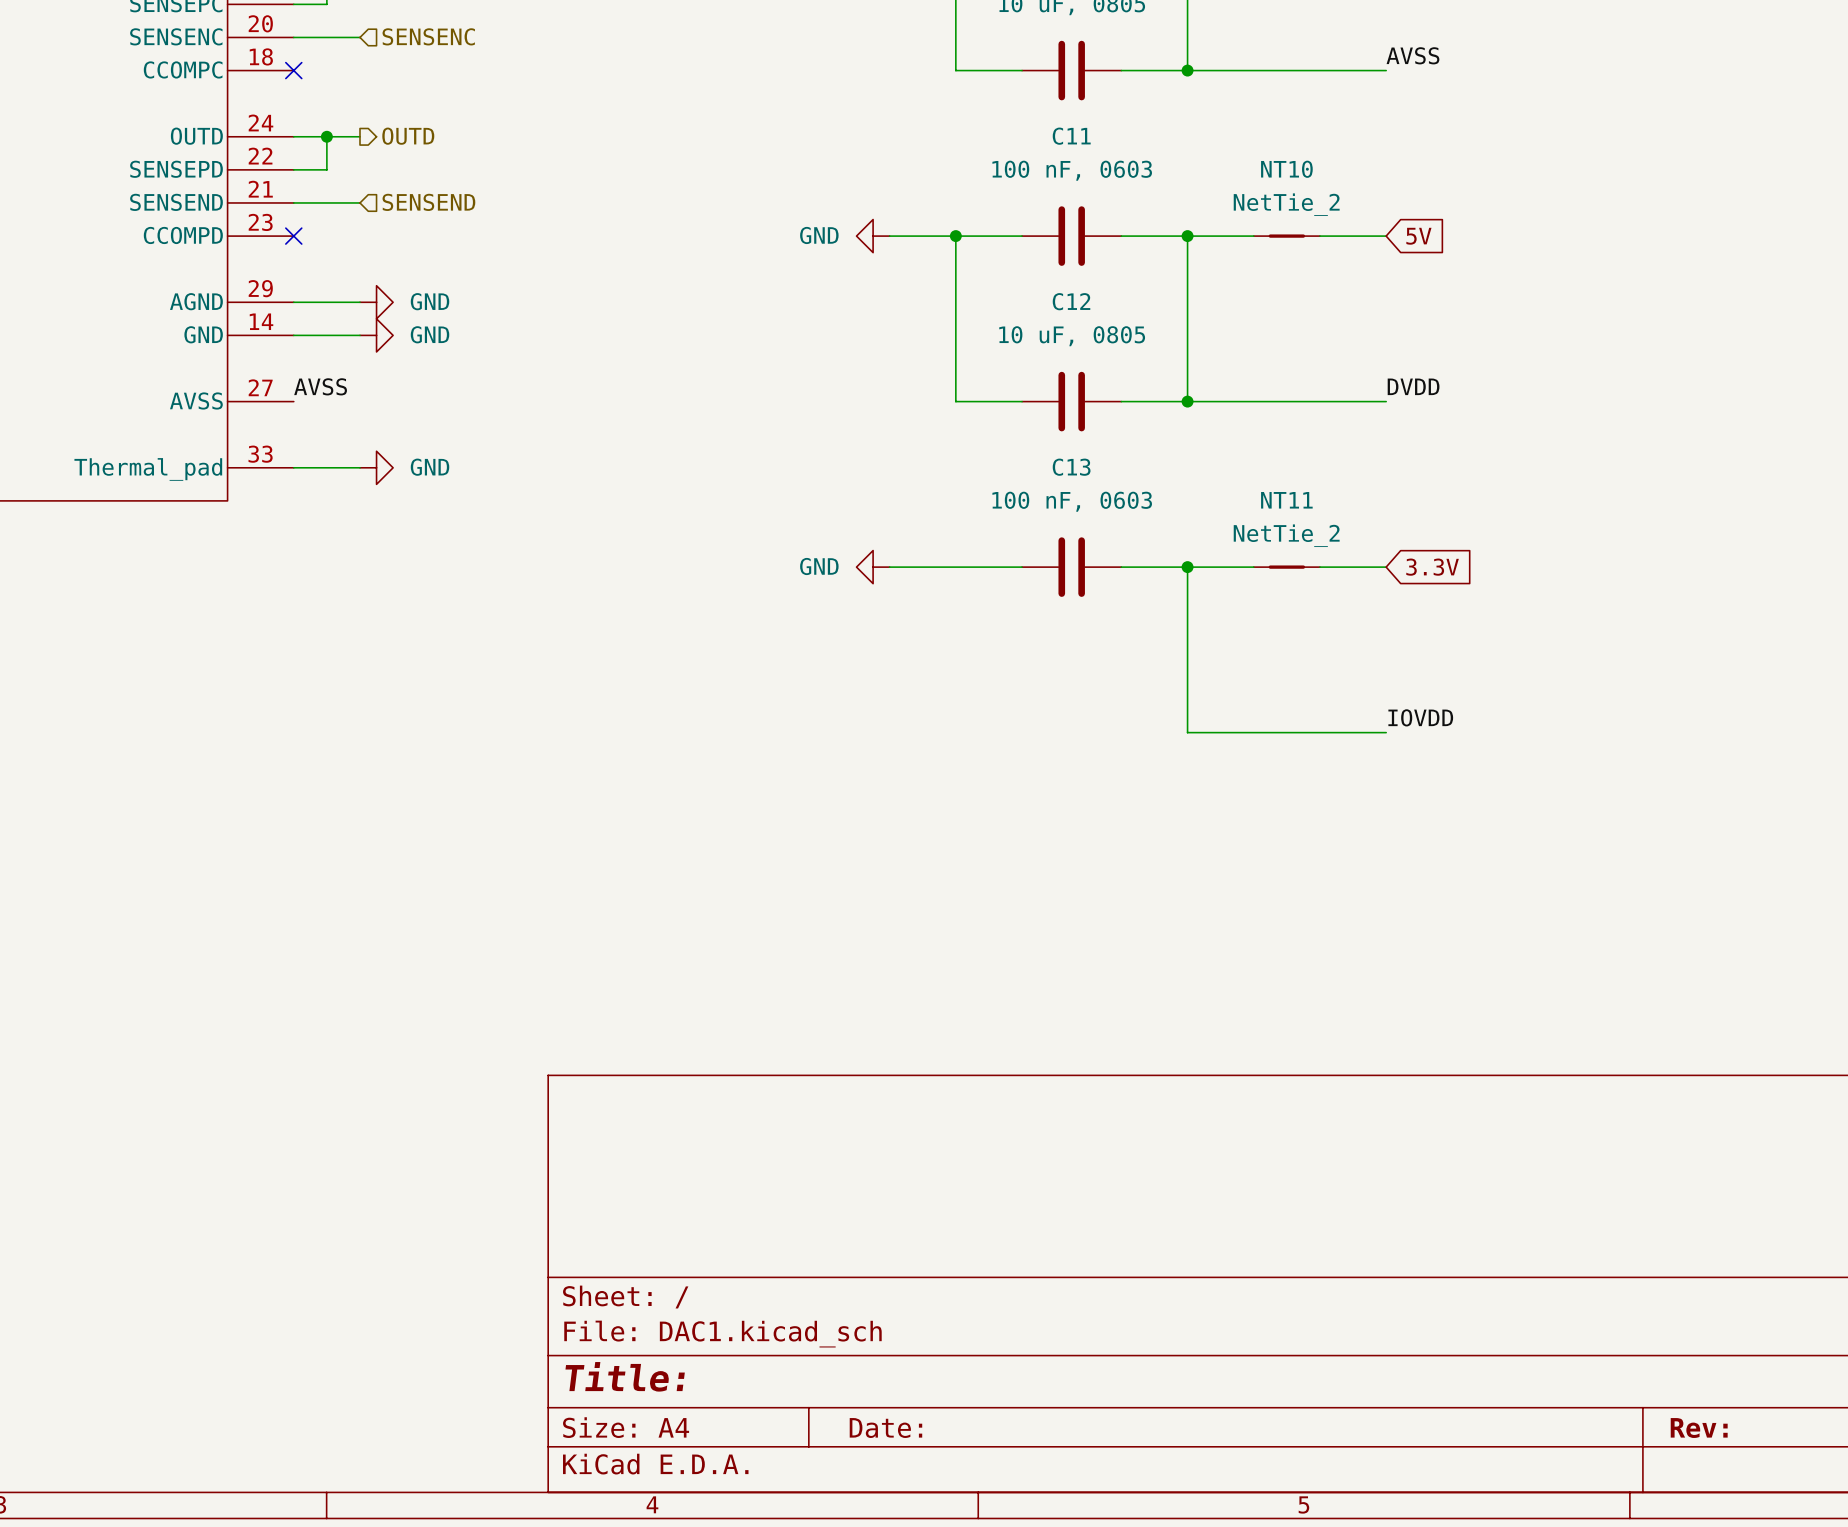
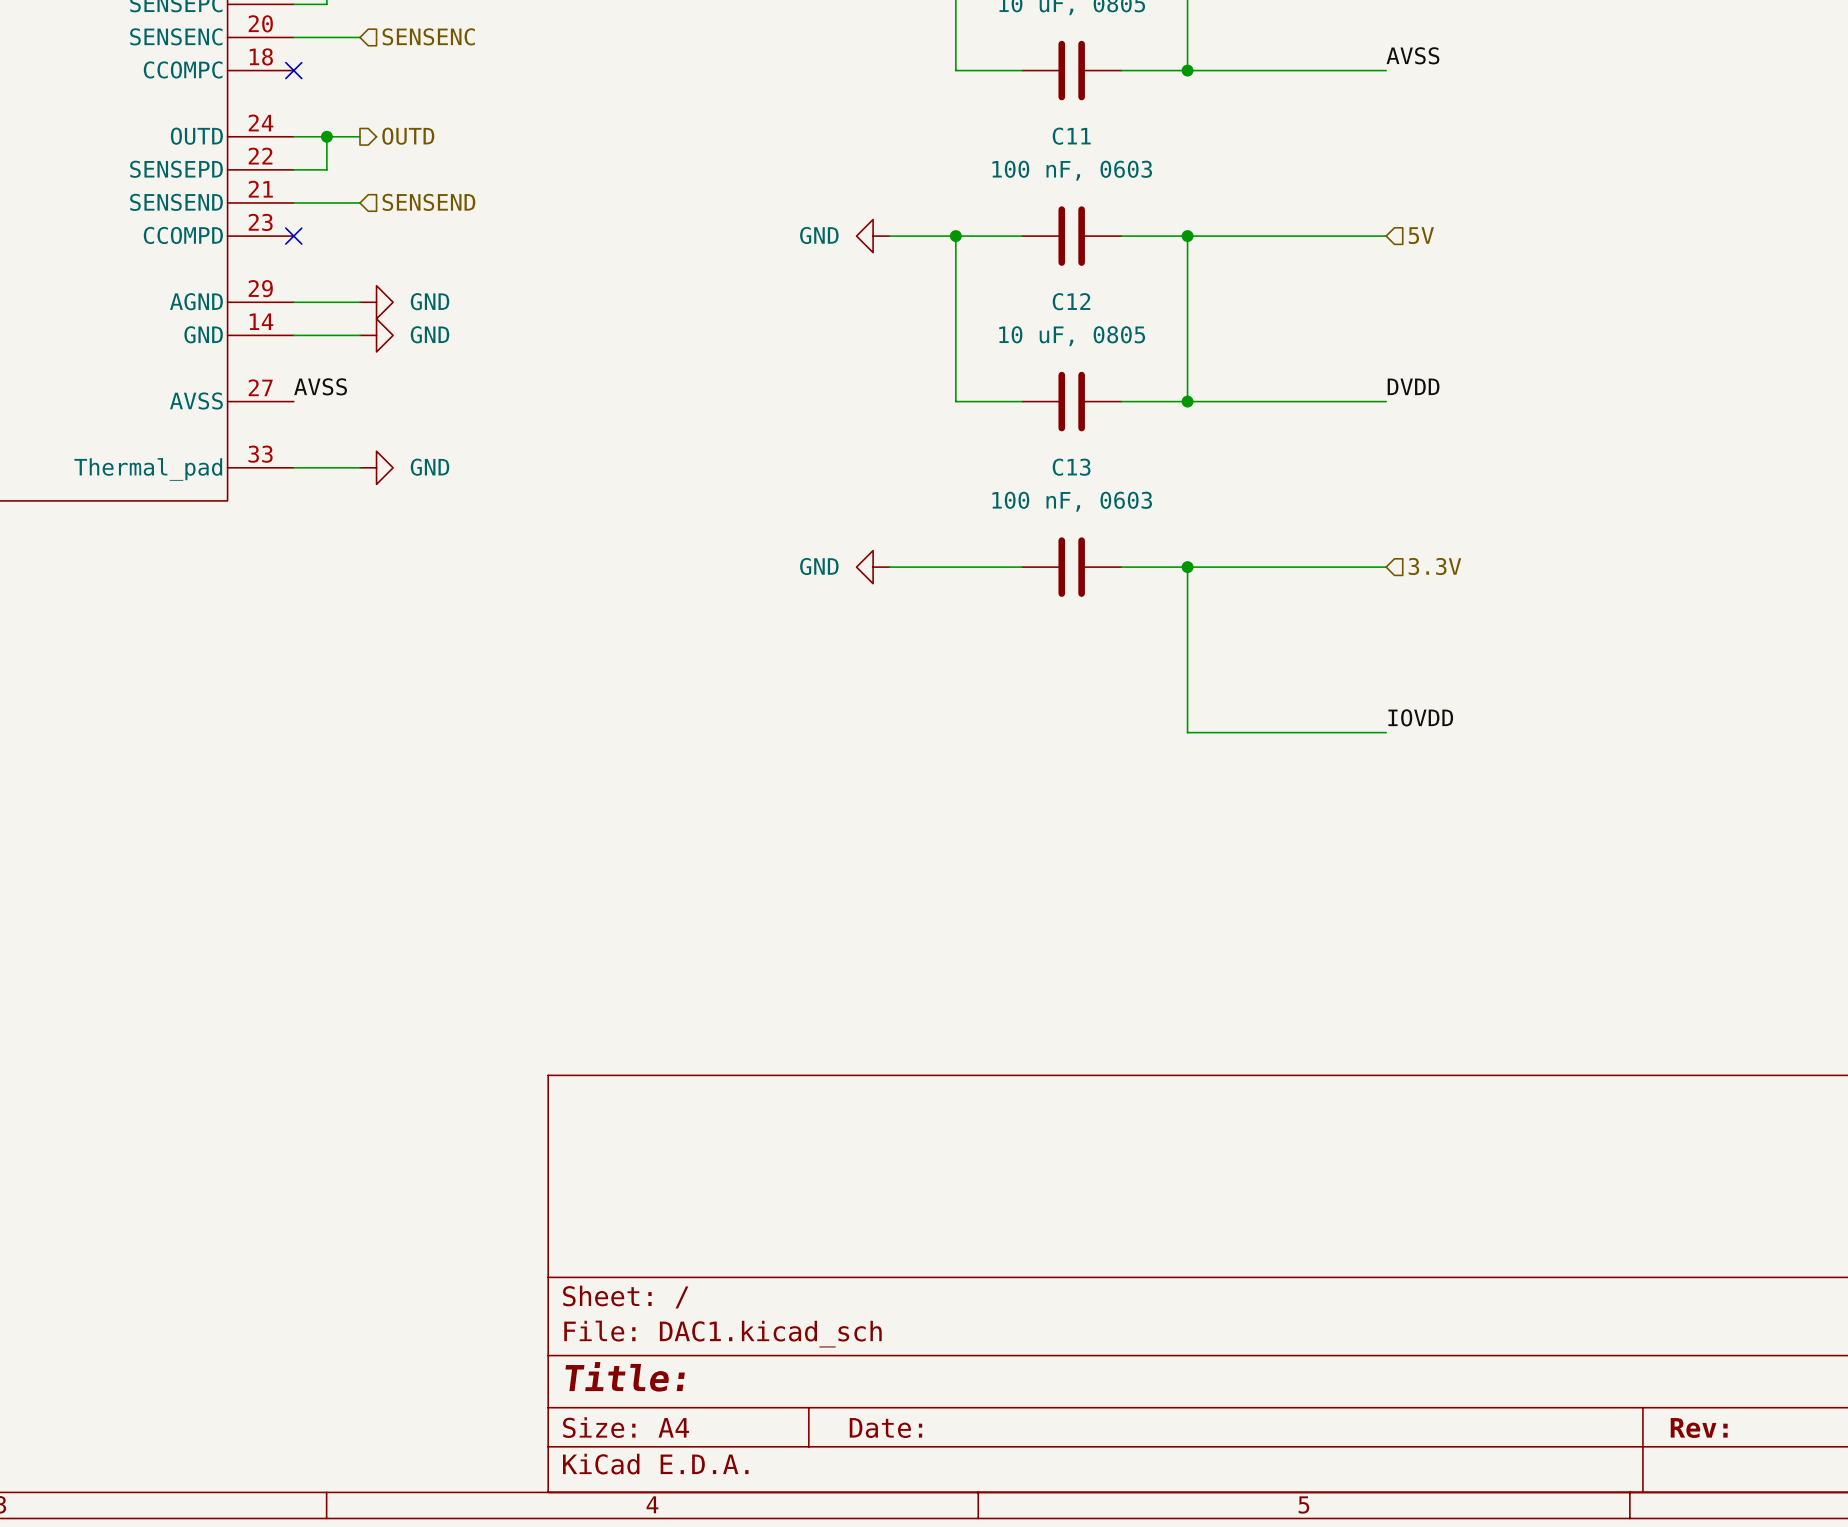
hierarchical label: none -> 5V (1421, 235)
NT10: NetTie_2 (1286, 236) -> none
global label: 5V (1418, 236) -> none
hierarchical label: none -> 3.3V (1434, 566)
NT11: NetTie_2 (1286, 567) -> none
global label: 3.3V (1432, 567) -> none

